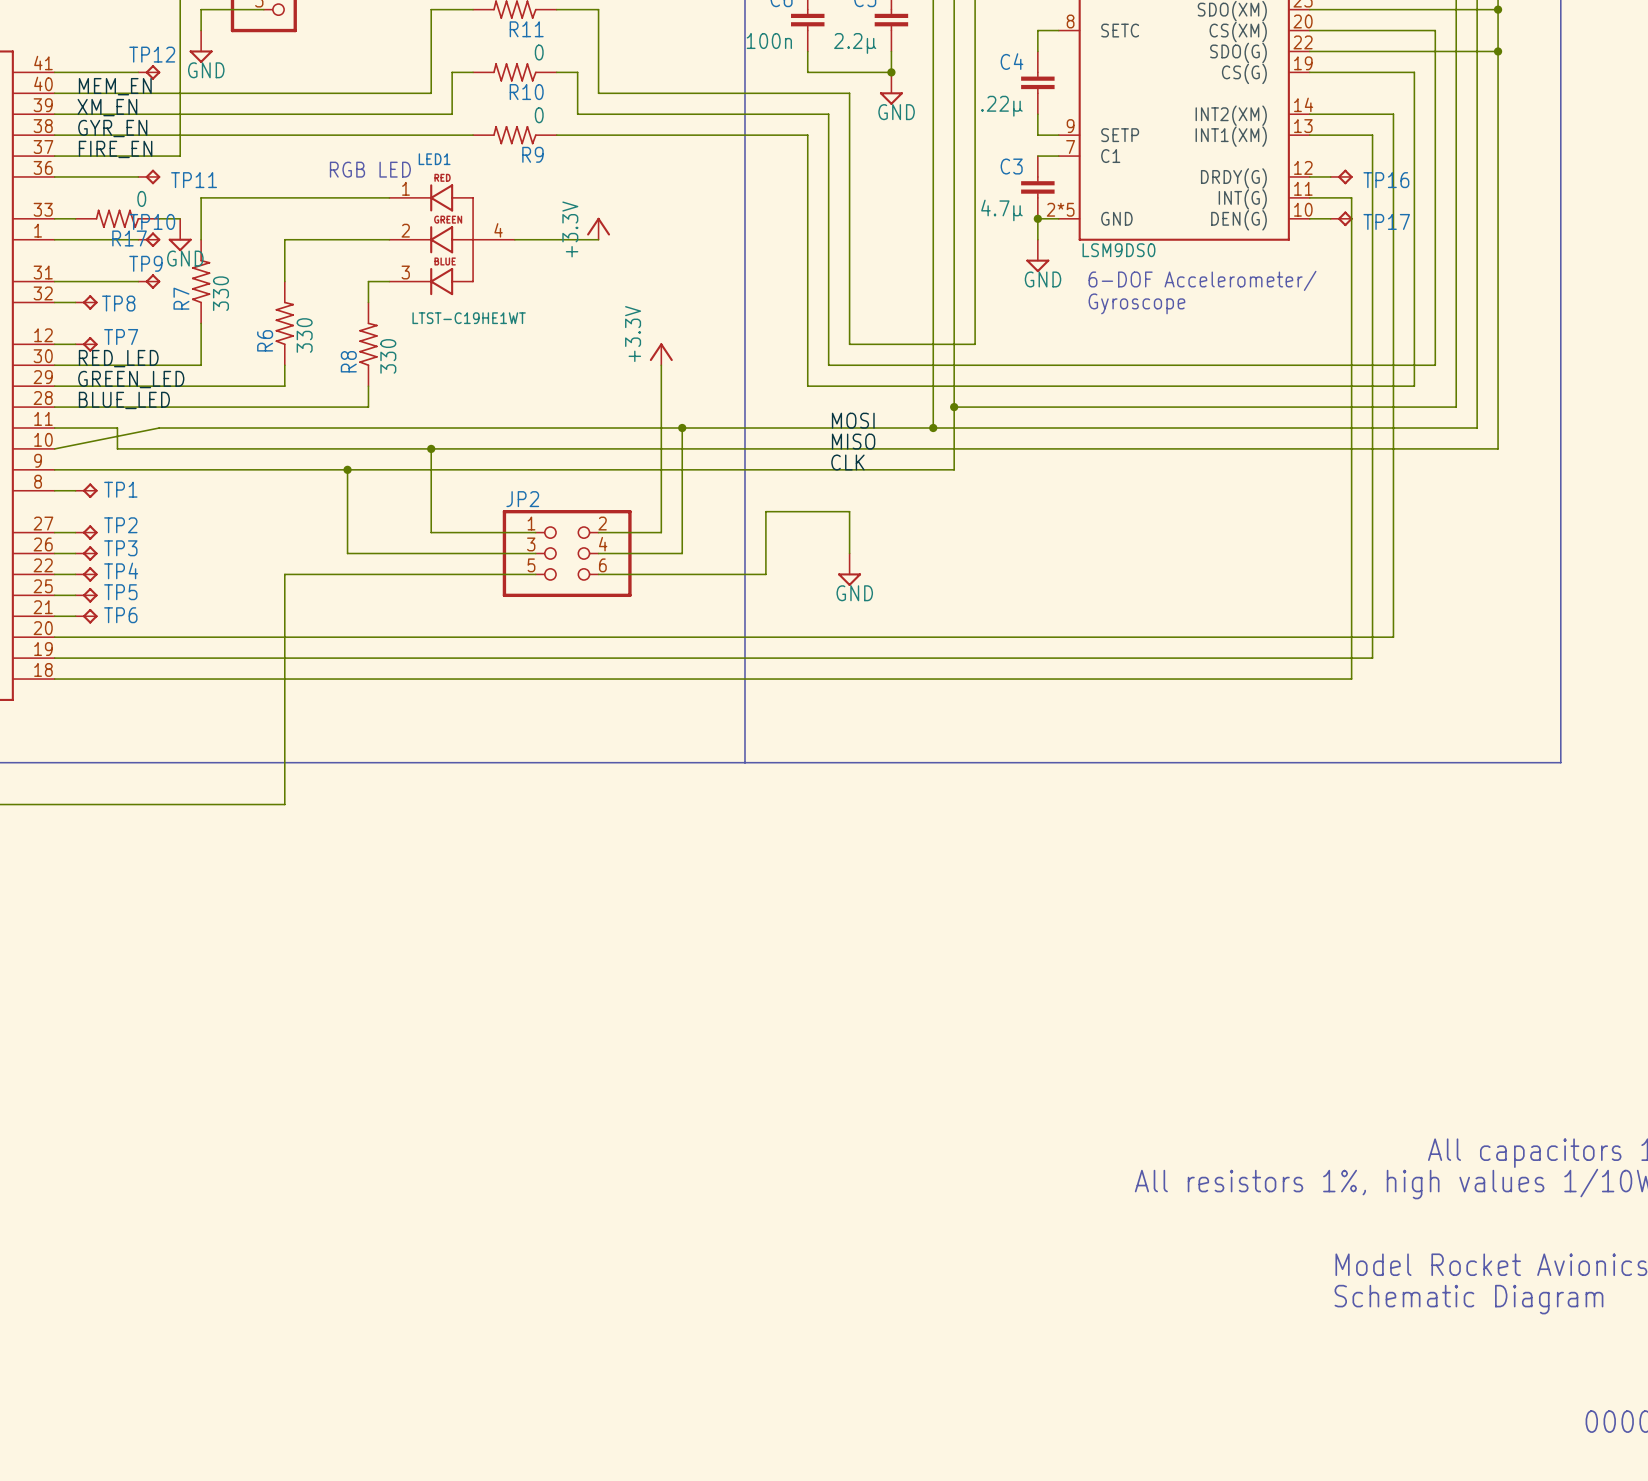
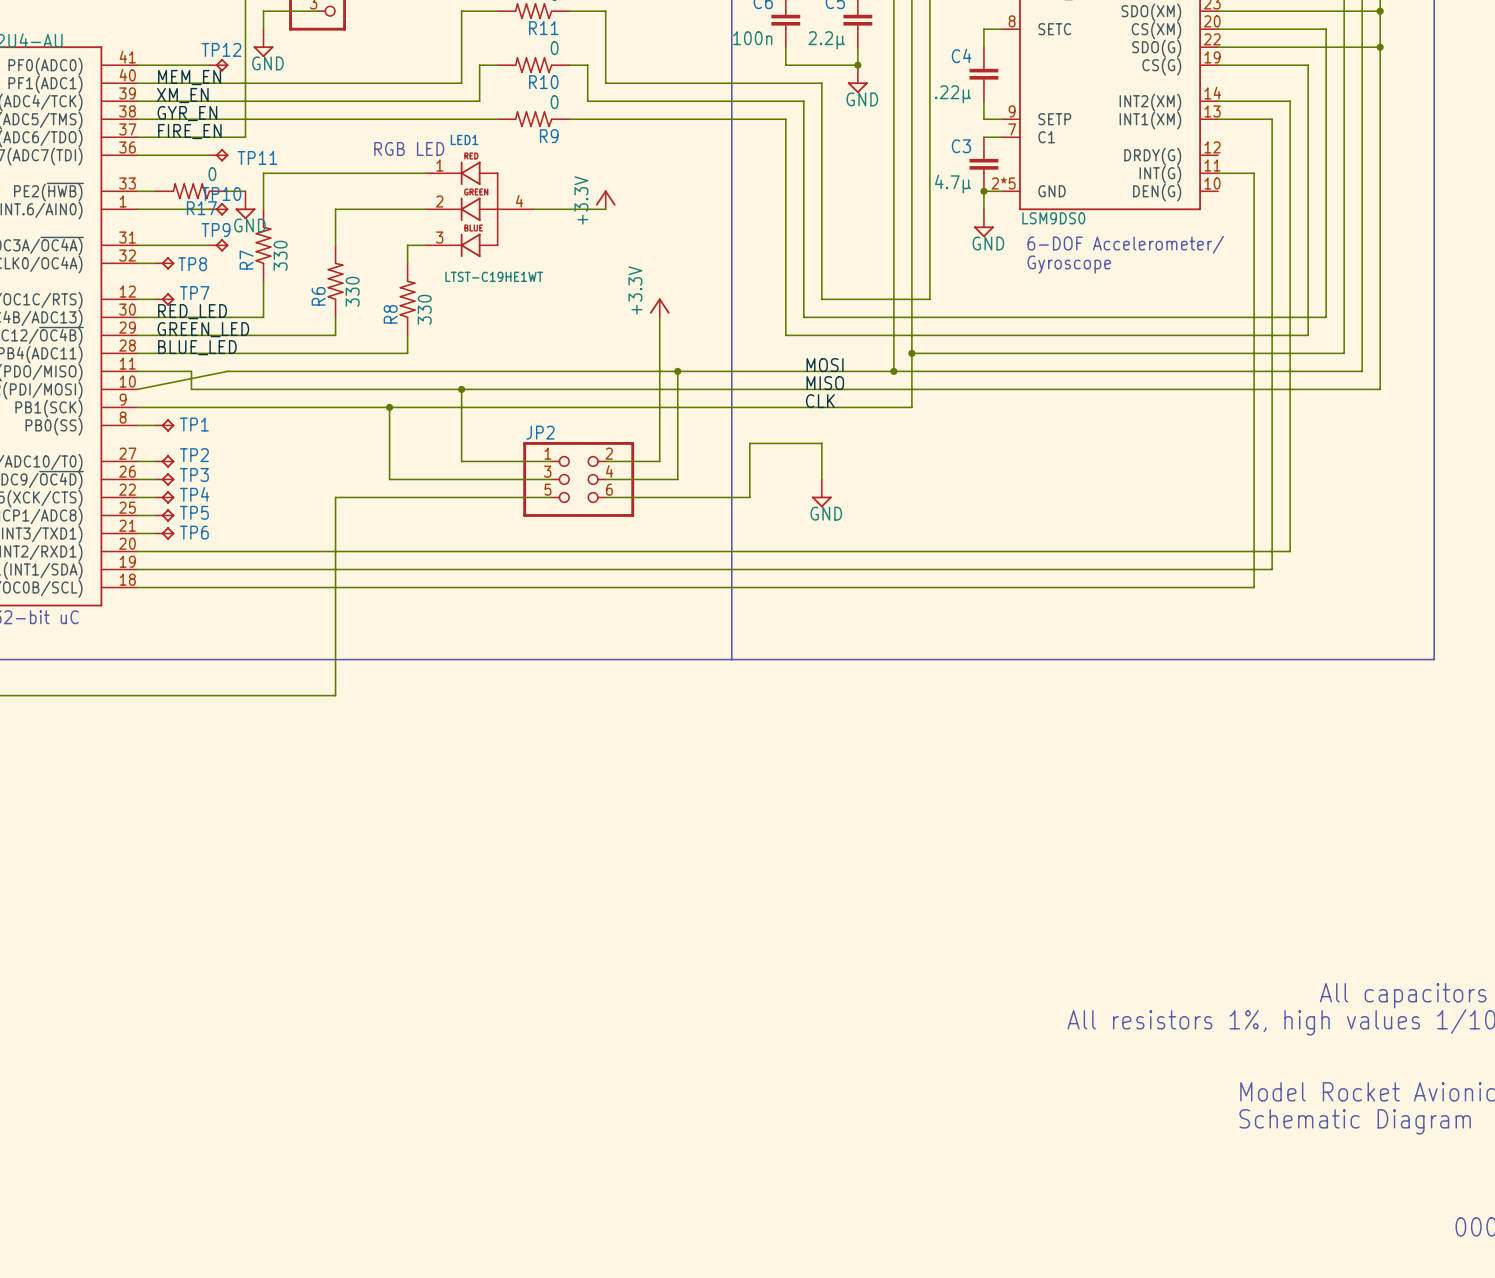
wire: (1309, 176) (1330, 176) -> none
TP16: (1341, 176) -> none
wire: (1309, 218) (1330, 218) -> none
TP17: (1341, 218) -> none

